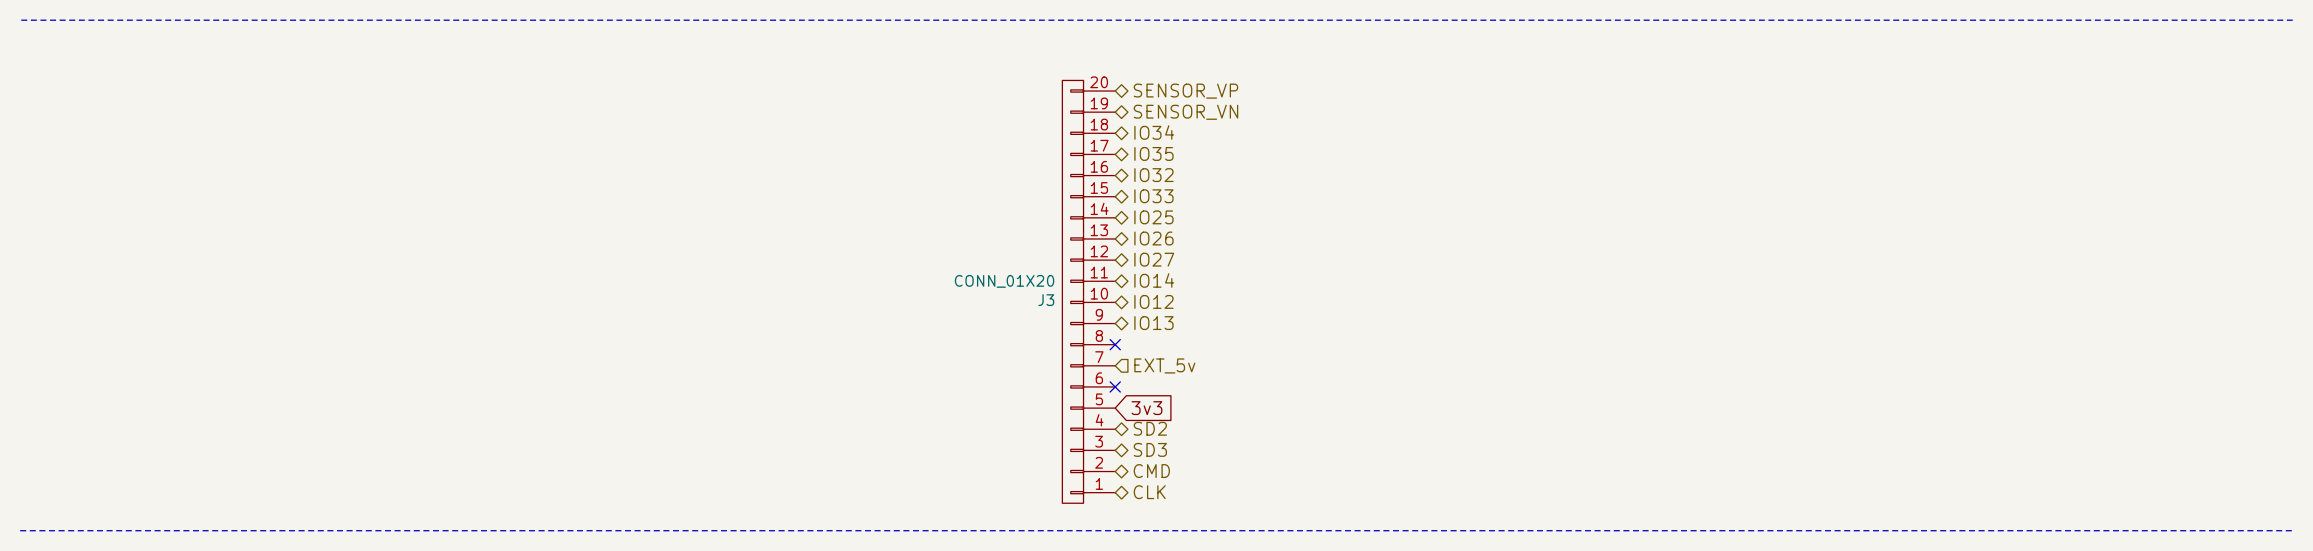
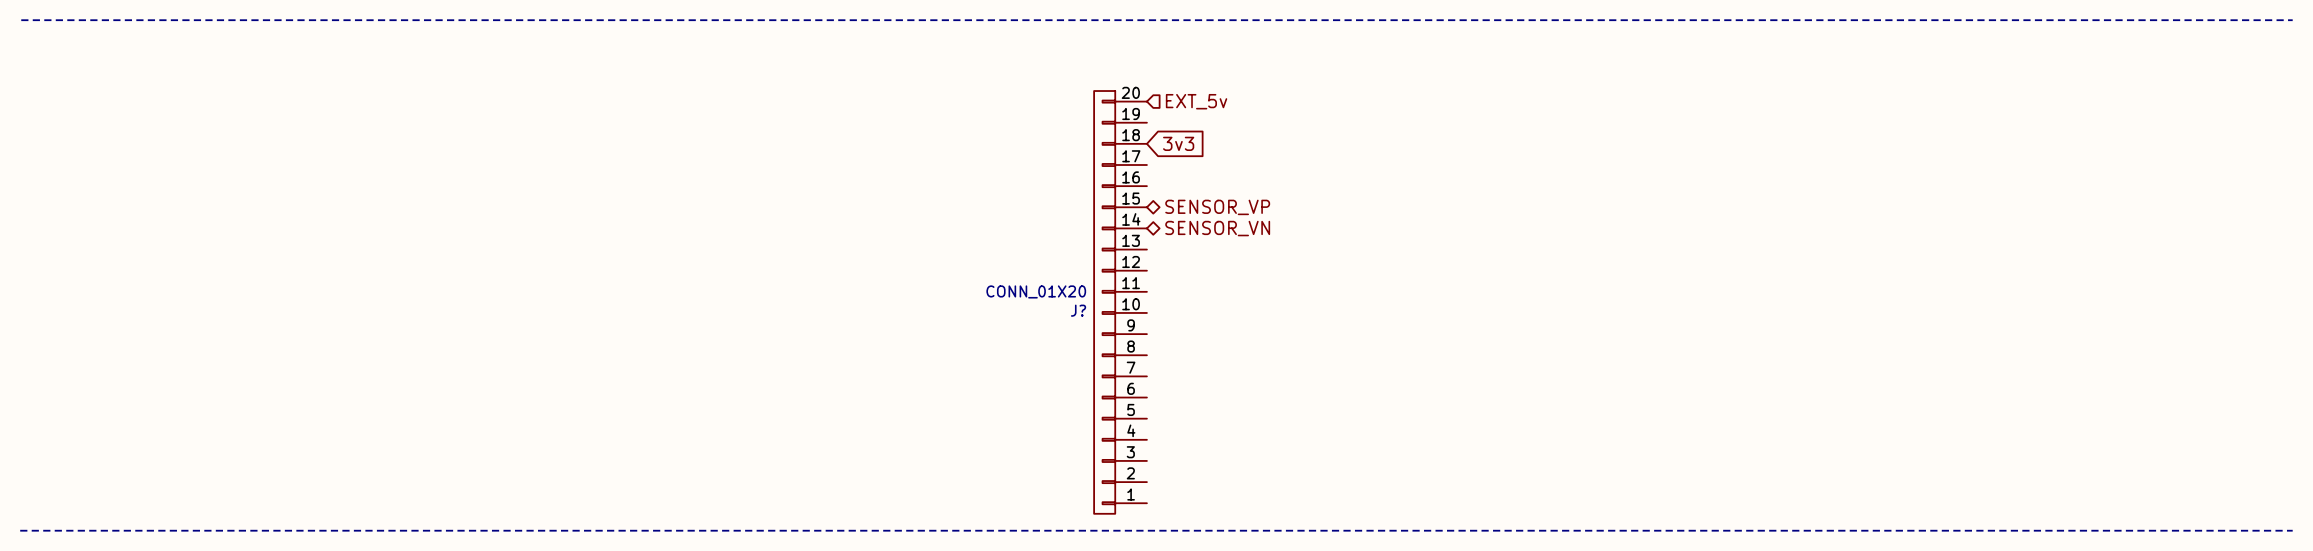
hierarchical label position: SENSOR_VP (1185, 91) -> SENSOR_VP (1217, 207)
hierarchical label: none -> EXT_5v (1196, 101)
hierarchical label position: SENSOR_VN (1185, 112) -> SENSOR_VN (1217, 228)
hierarchical label: IO34 (1154, 132) -> none
global label: none -> 3v3 (1178, 143)
hierarchical label: IO35 (1153, 153) -> none
hierarchical label: IO32 (1153, 175) -> none
hierarchical label: IO33 (1153, 196) -> none
hierarchical label: IO25 (1153, 217) -> none
hierarchical label: IO26 (1153, 238) -> none
hierarchical label: IO27 (1154, 259) -> none
hierarchical label: IO14 (1154, 280) -> none
J3: CONN_01X20 (1088, 291) -> none
hierarchical label: IO12 (1153, 301) -> none
J?: none -> CONN_01X20 (1120, 302)
hierarchical label: IO13 (1153, 323) -> none
no-connect mark: (1115, 344) -> none
hierarchical label: EXT_5v (1164, 365) -> none
no-connect mark: (1115, 386) -> none
global label: 3v3 (1146, 408) -> none
hierarchical label: SD2 (1150, 428) -> none
hierarchical label: SD3 (1150, 449) -> none
hierarchical label: CMD (1151, 471) -> none
hierarchical label: CLK (1149, 492) -> none

